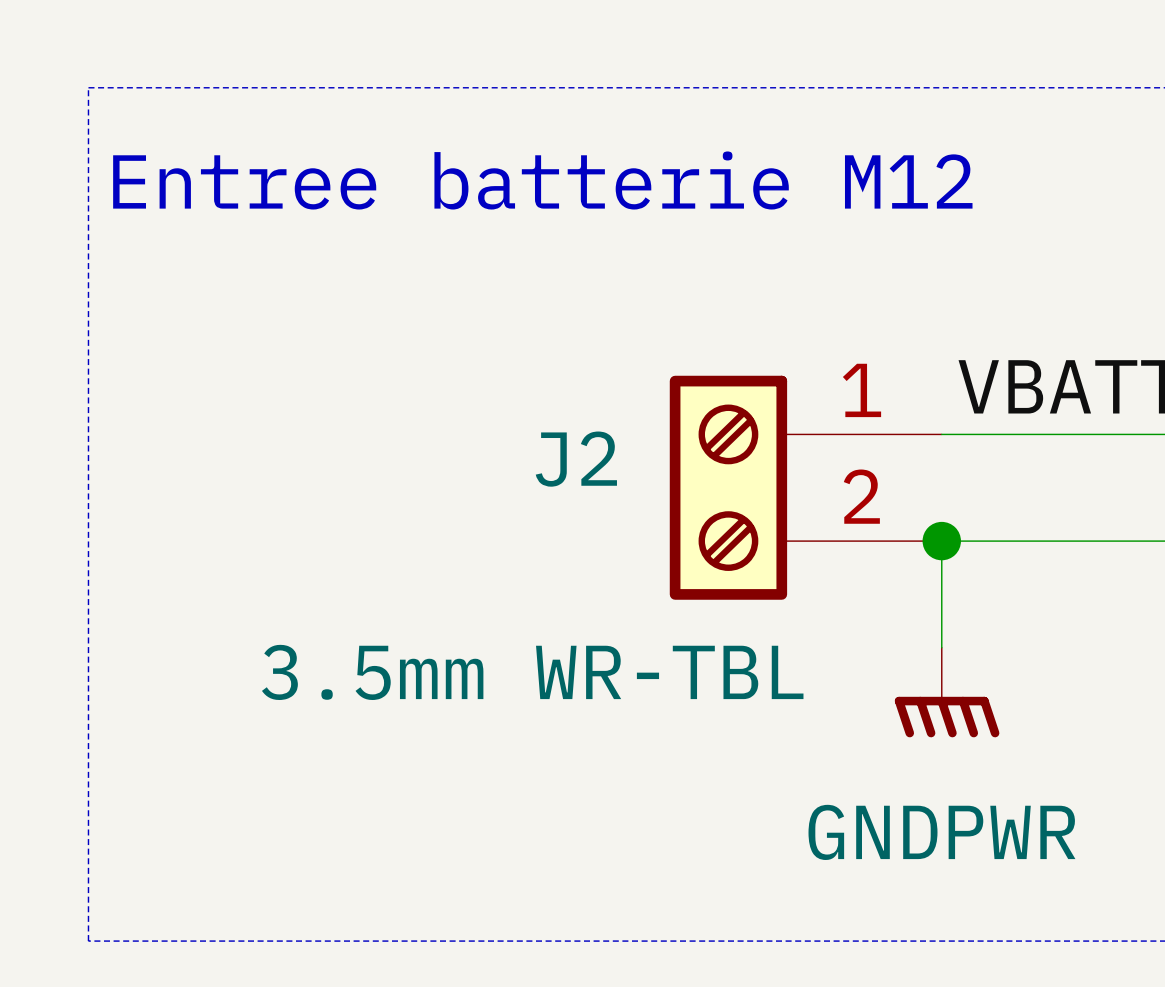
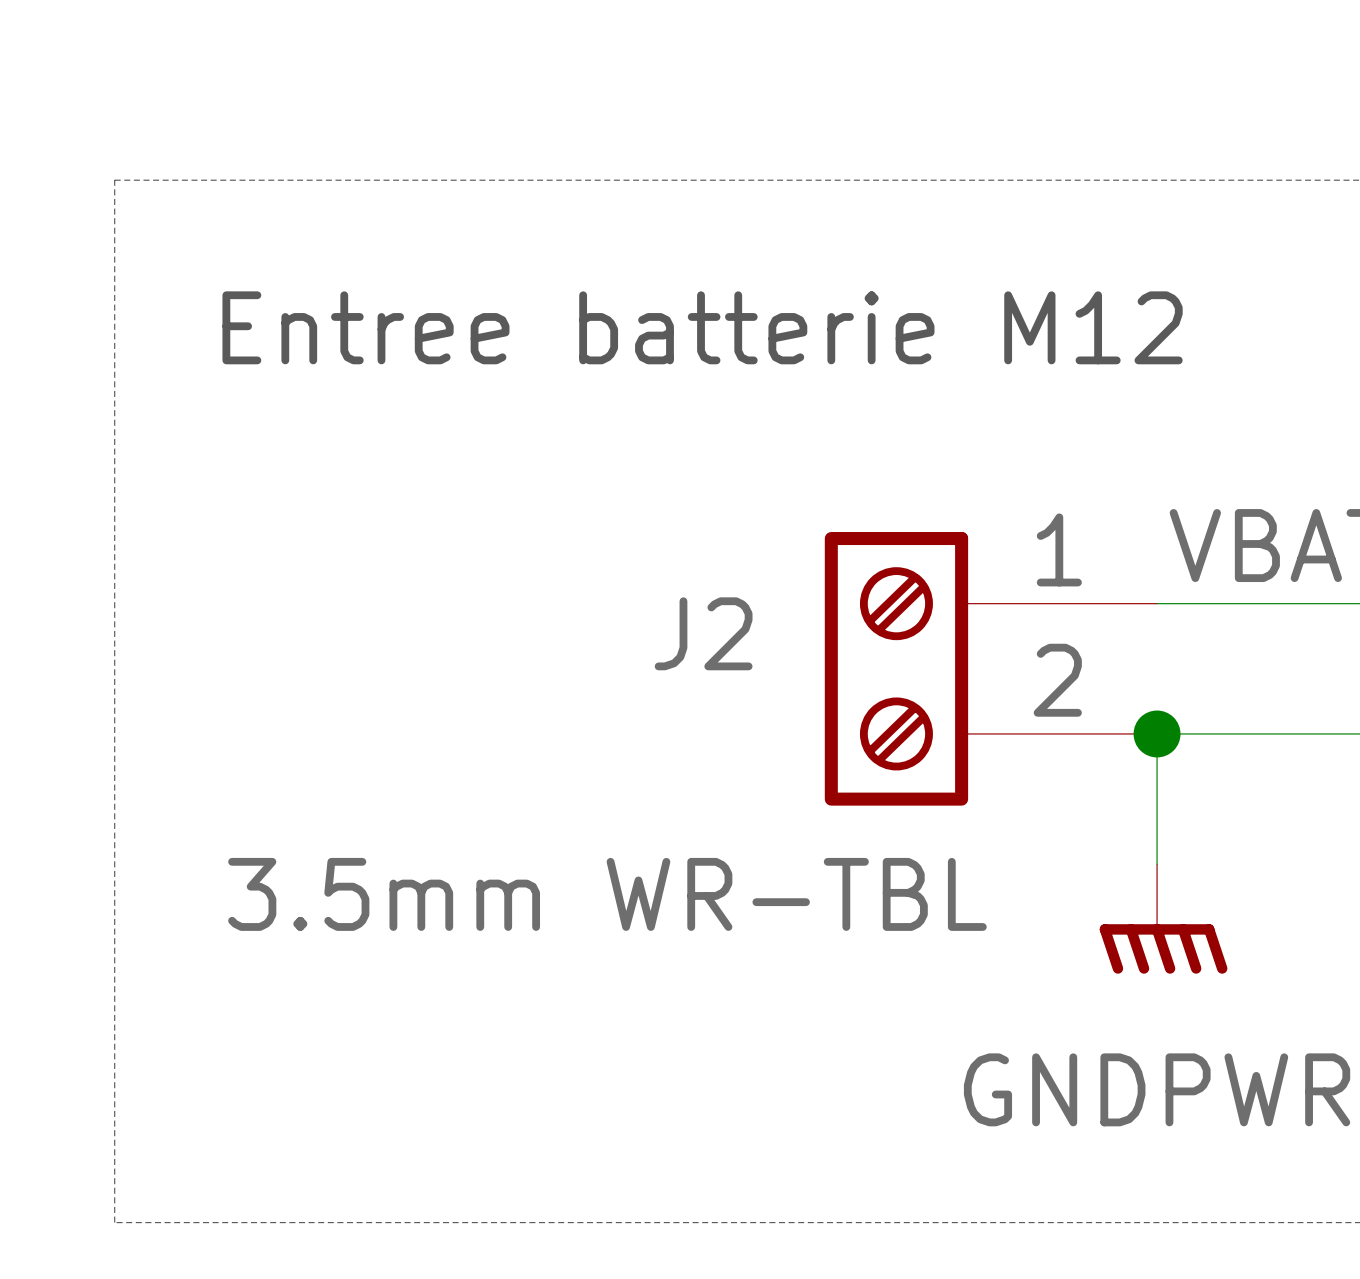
text position: Entree batterie M12 (542, 180) -> Entree batterie M12 (702, 327)

